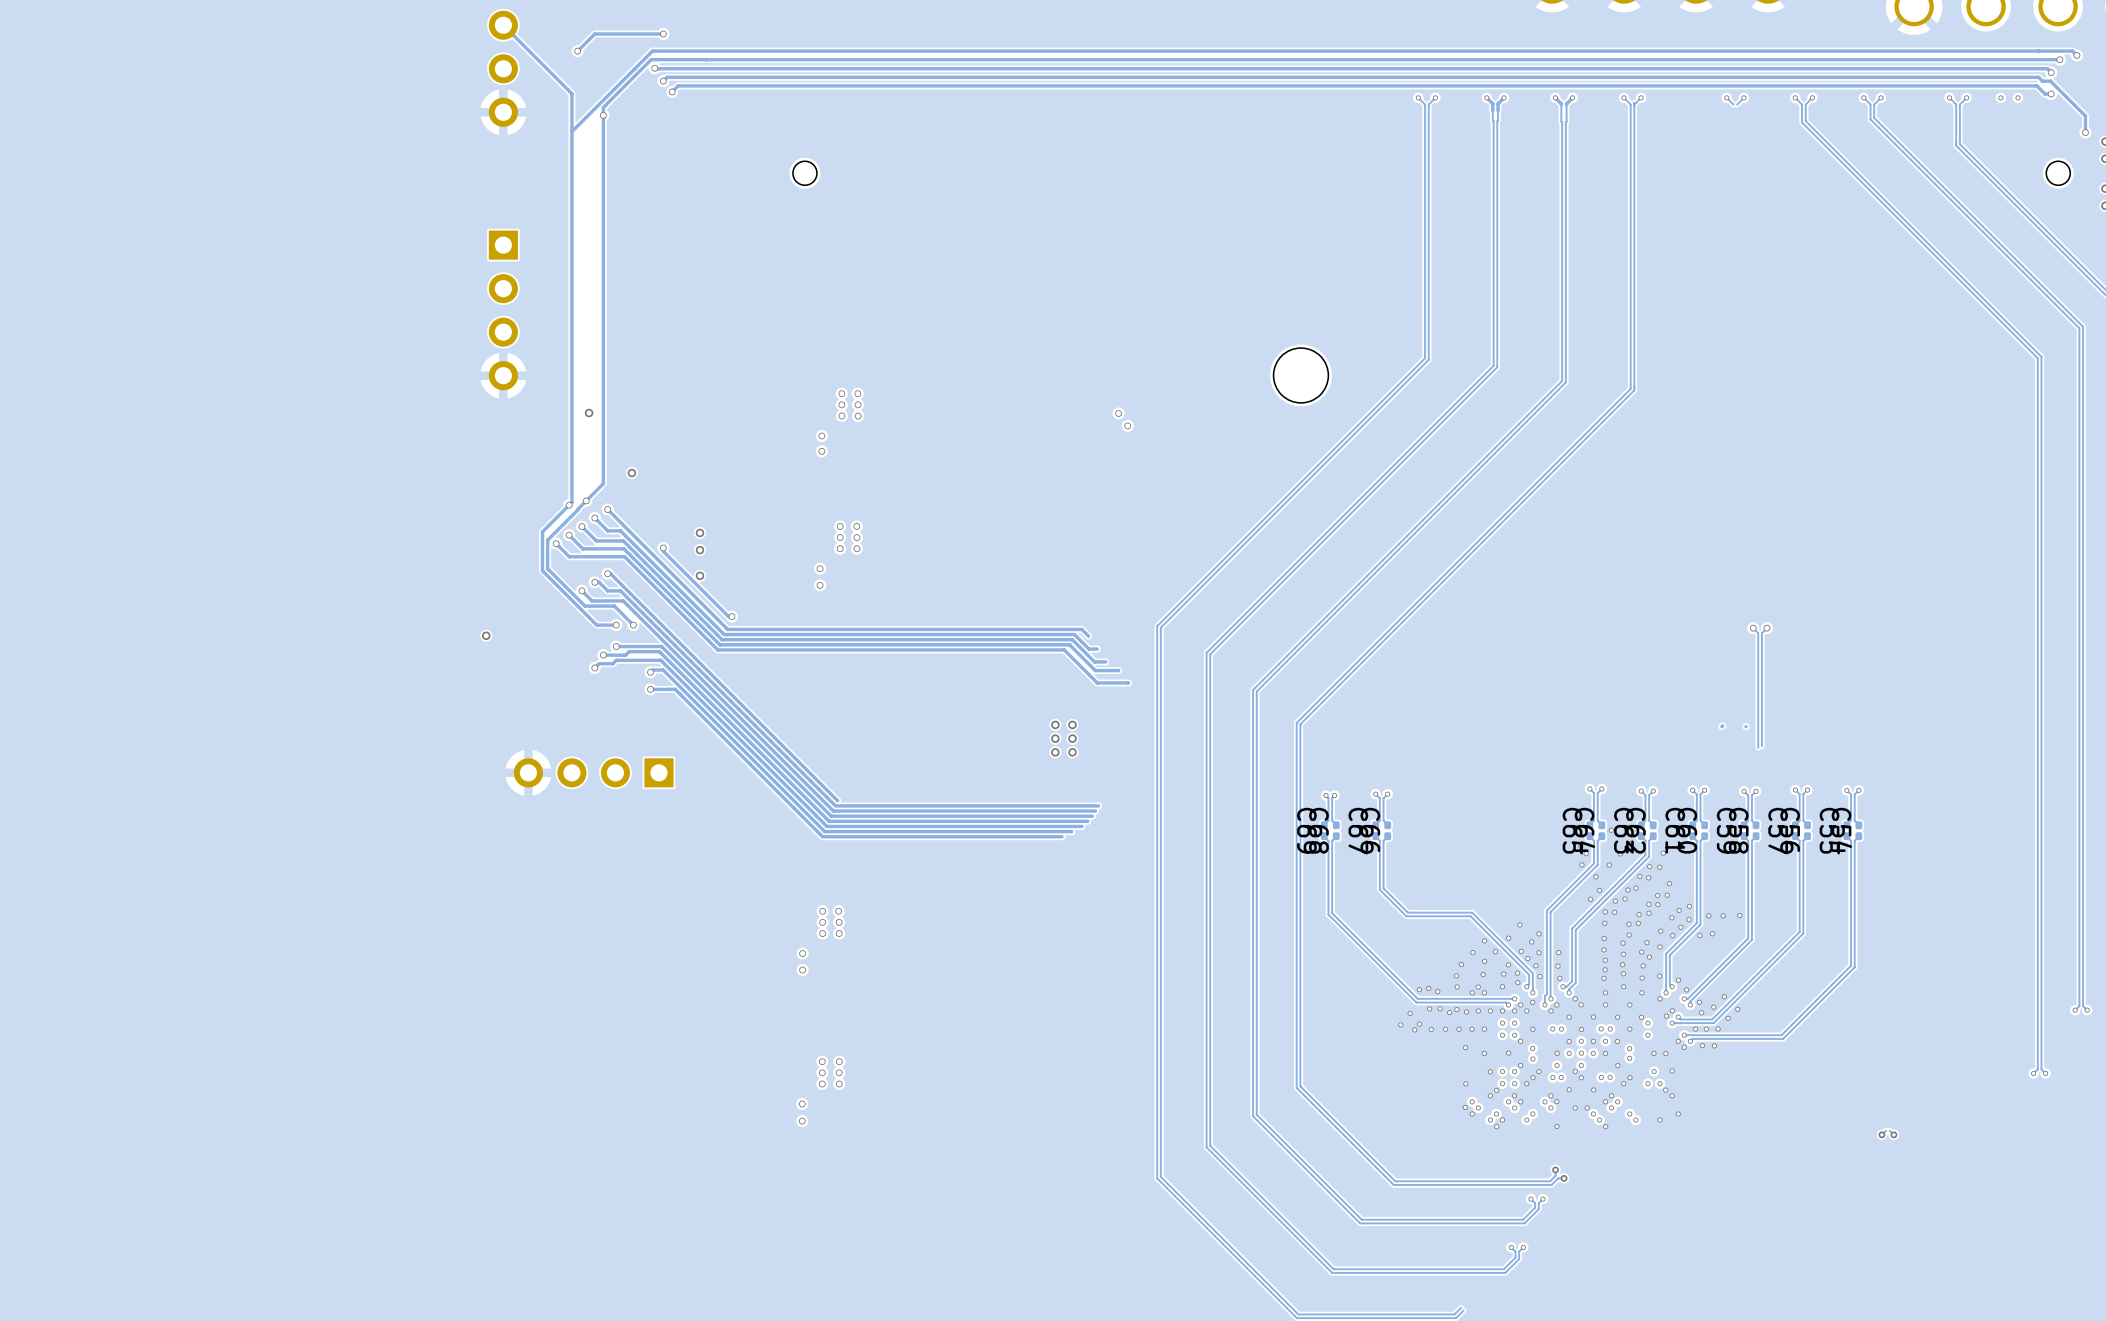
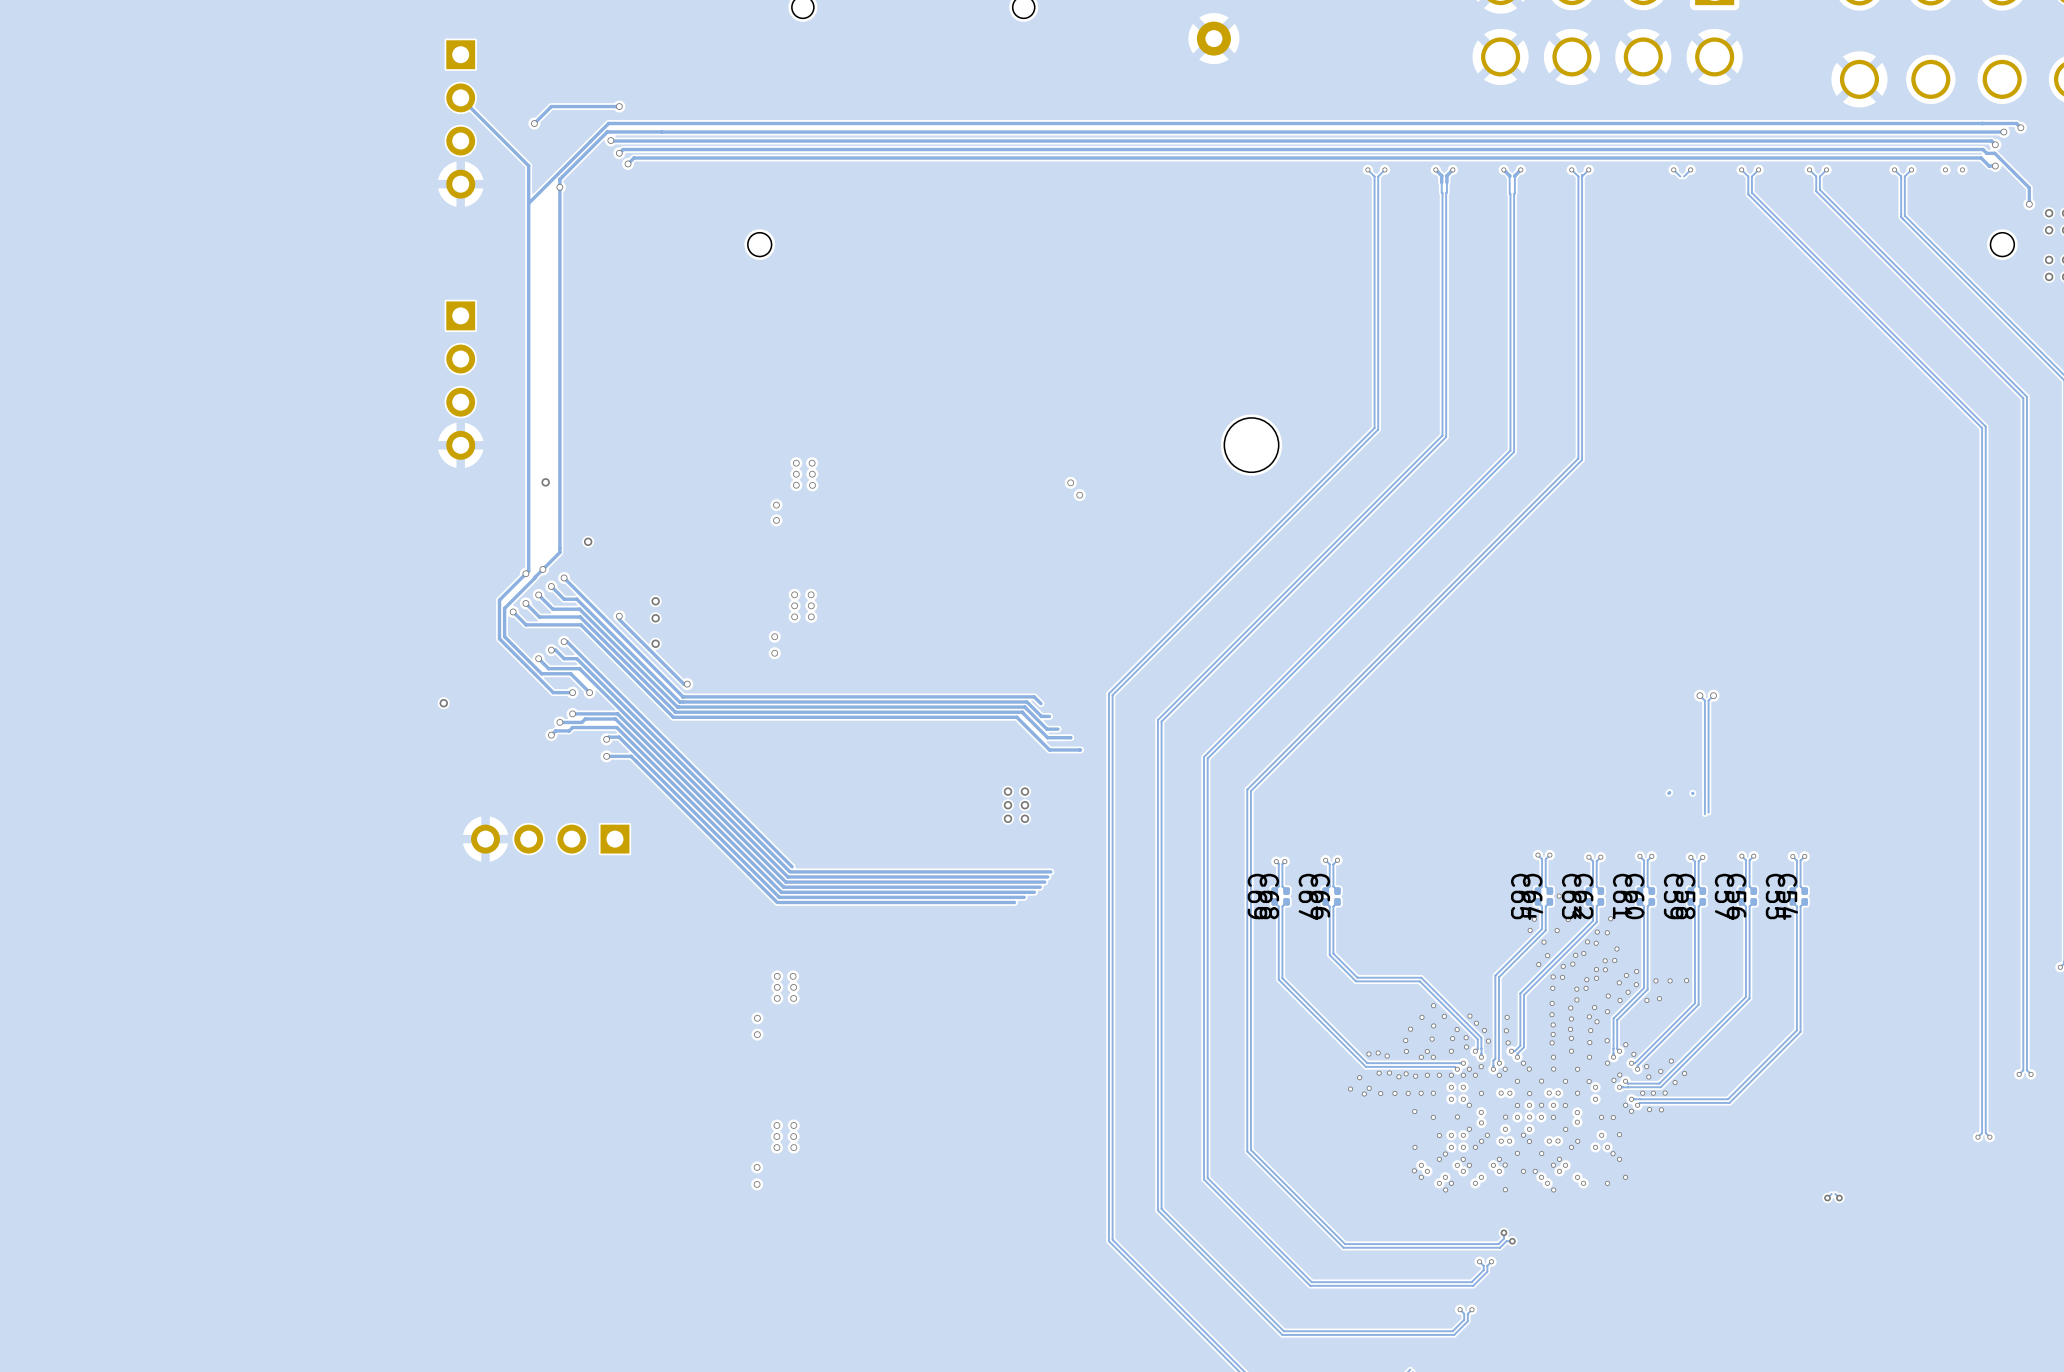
via: (1519, 924) -> none
via: (1539, 933) -> none
via: (1508, 938) -> none
via: (1531, 942) -> none
via: (1539, 952) -> none

